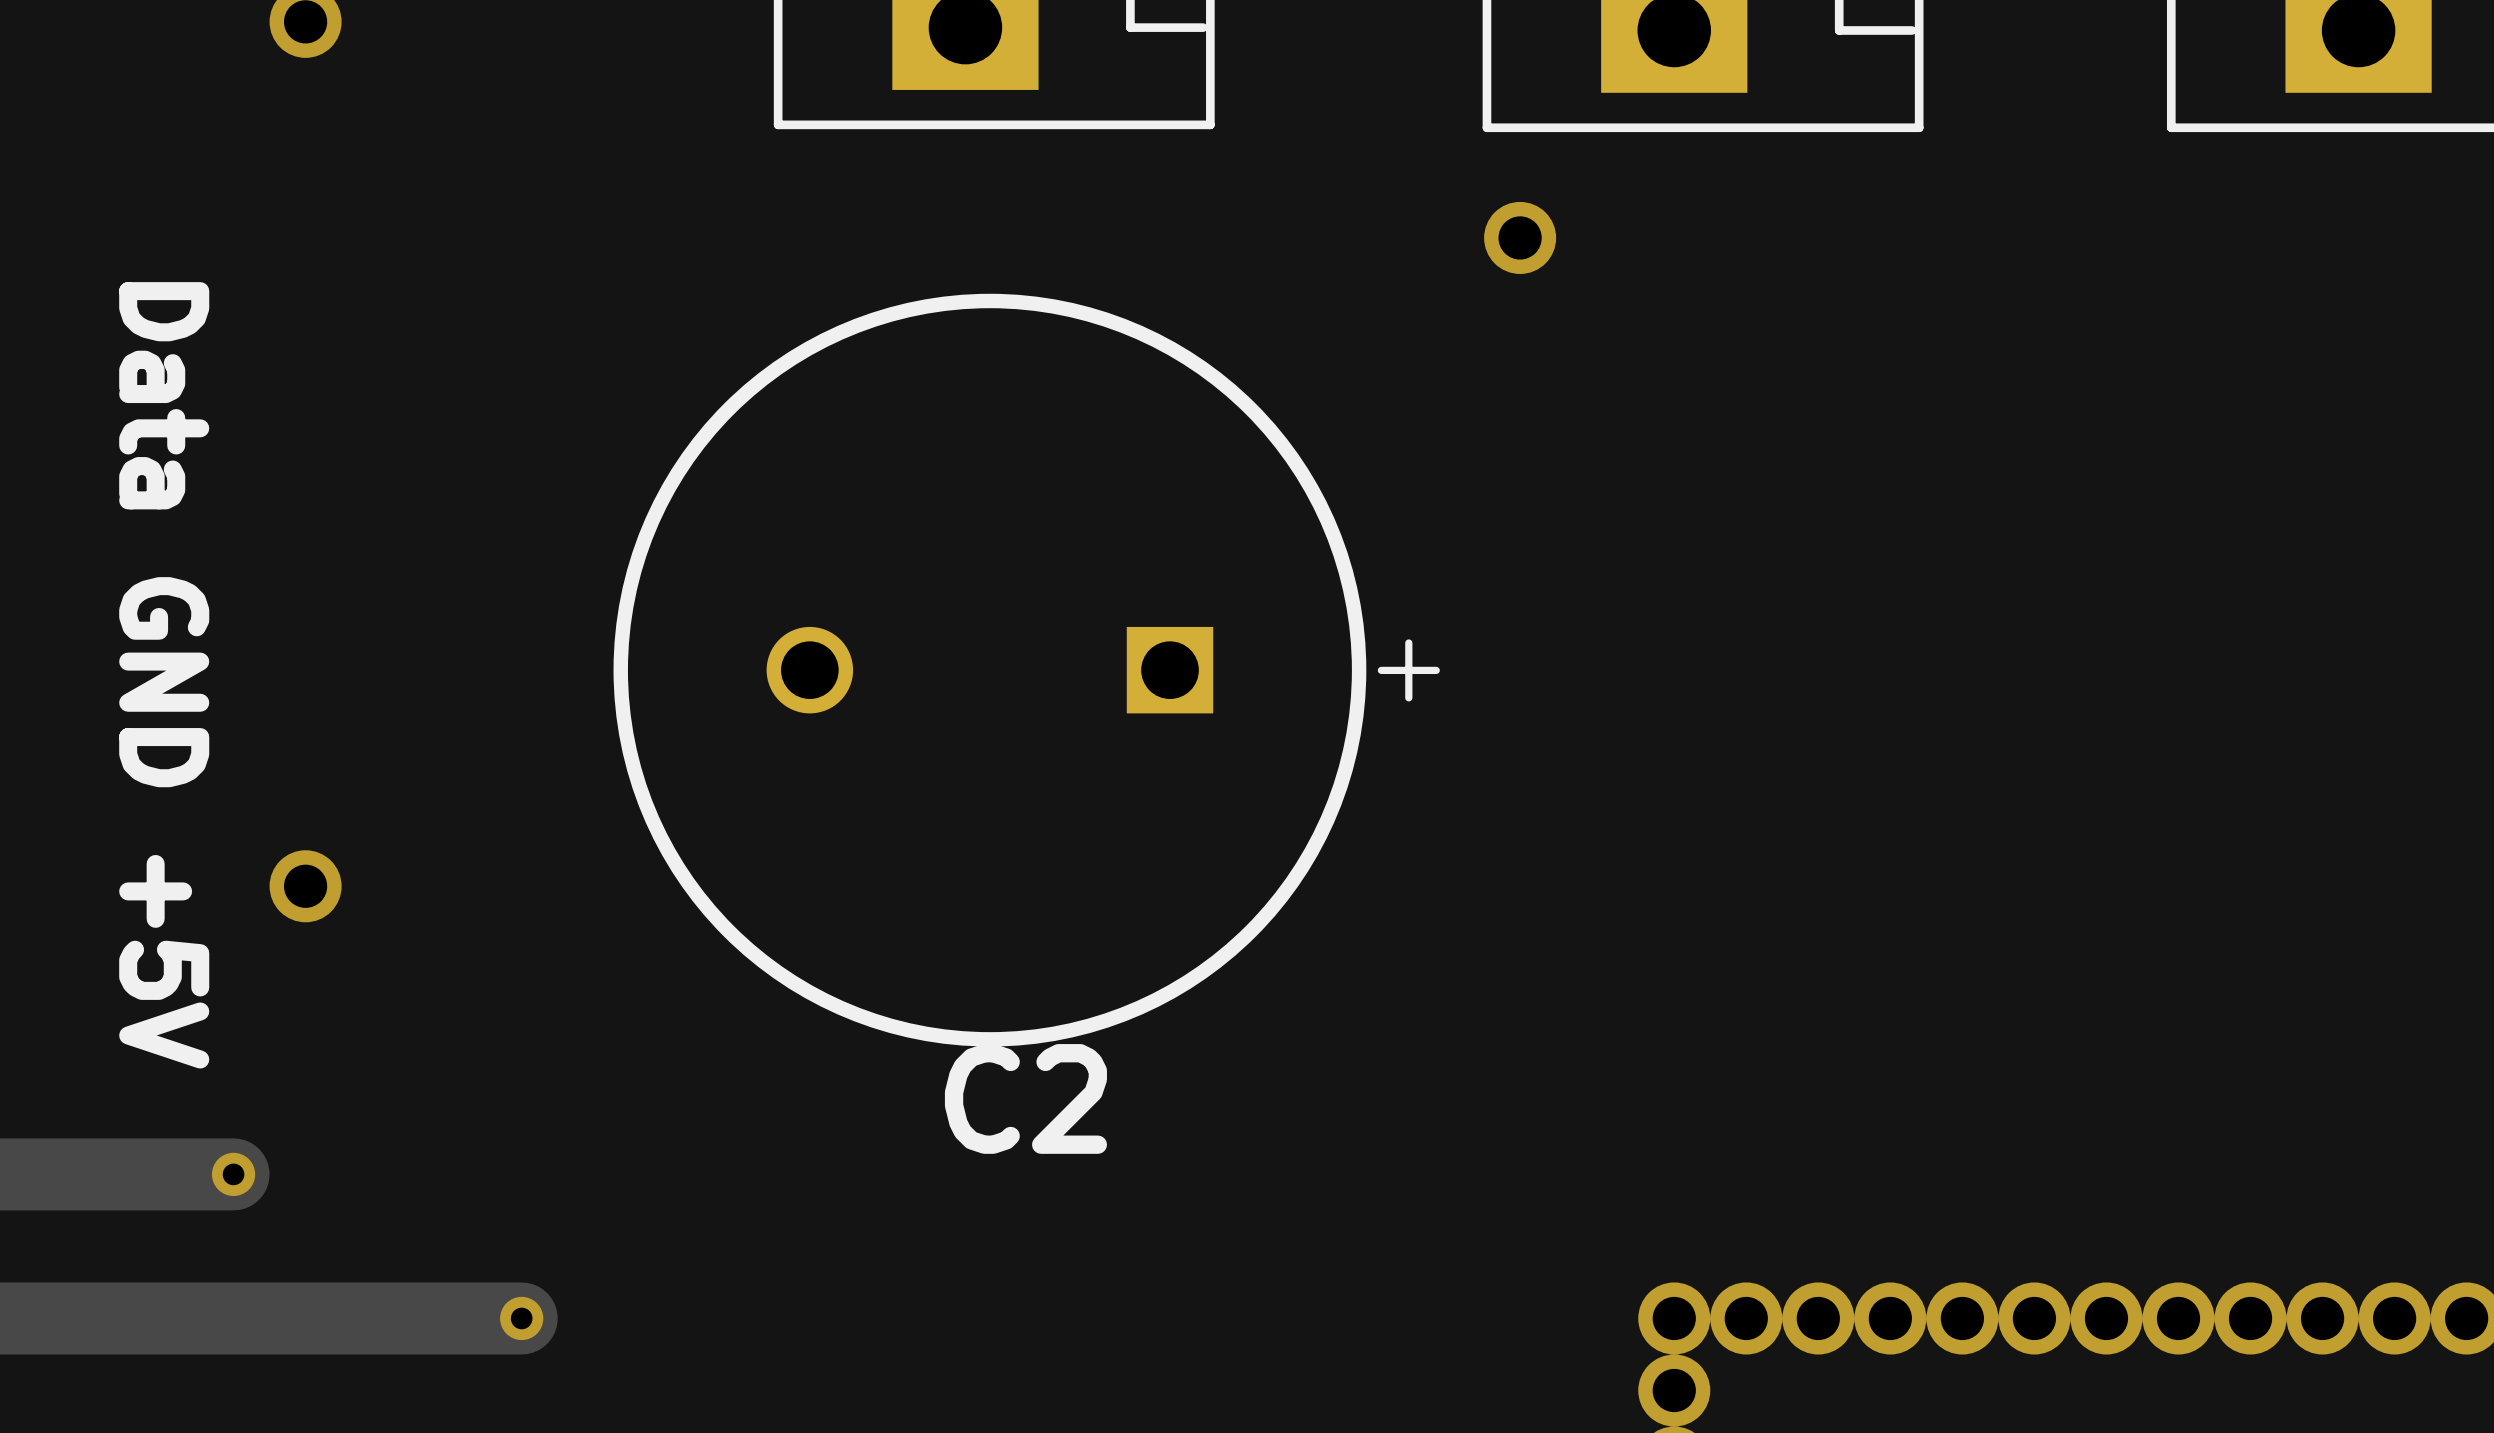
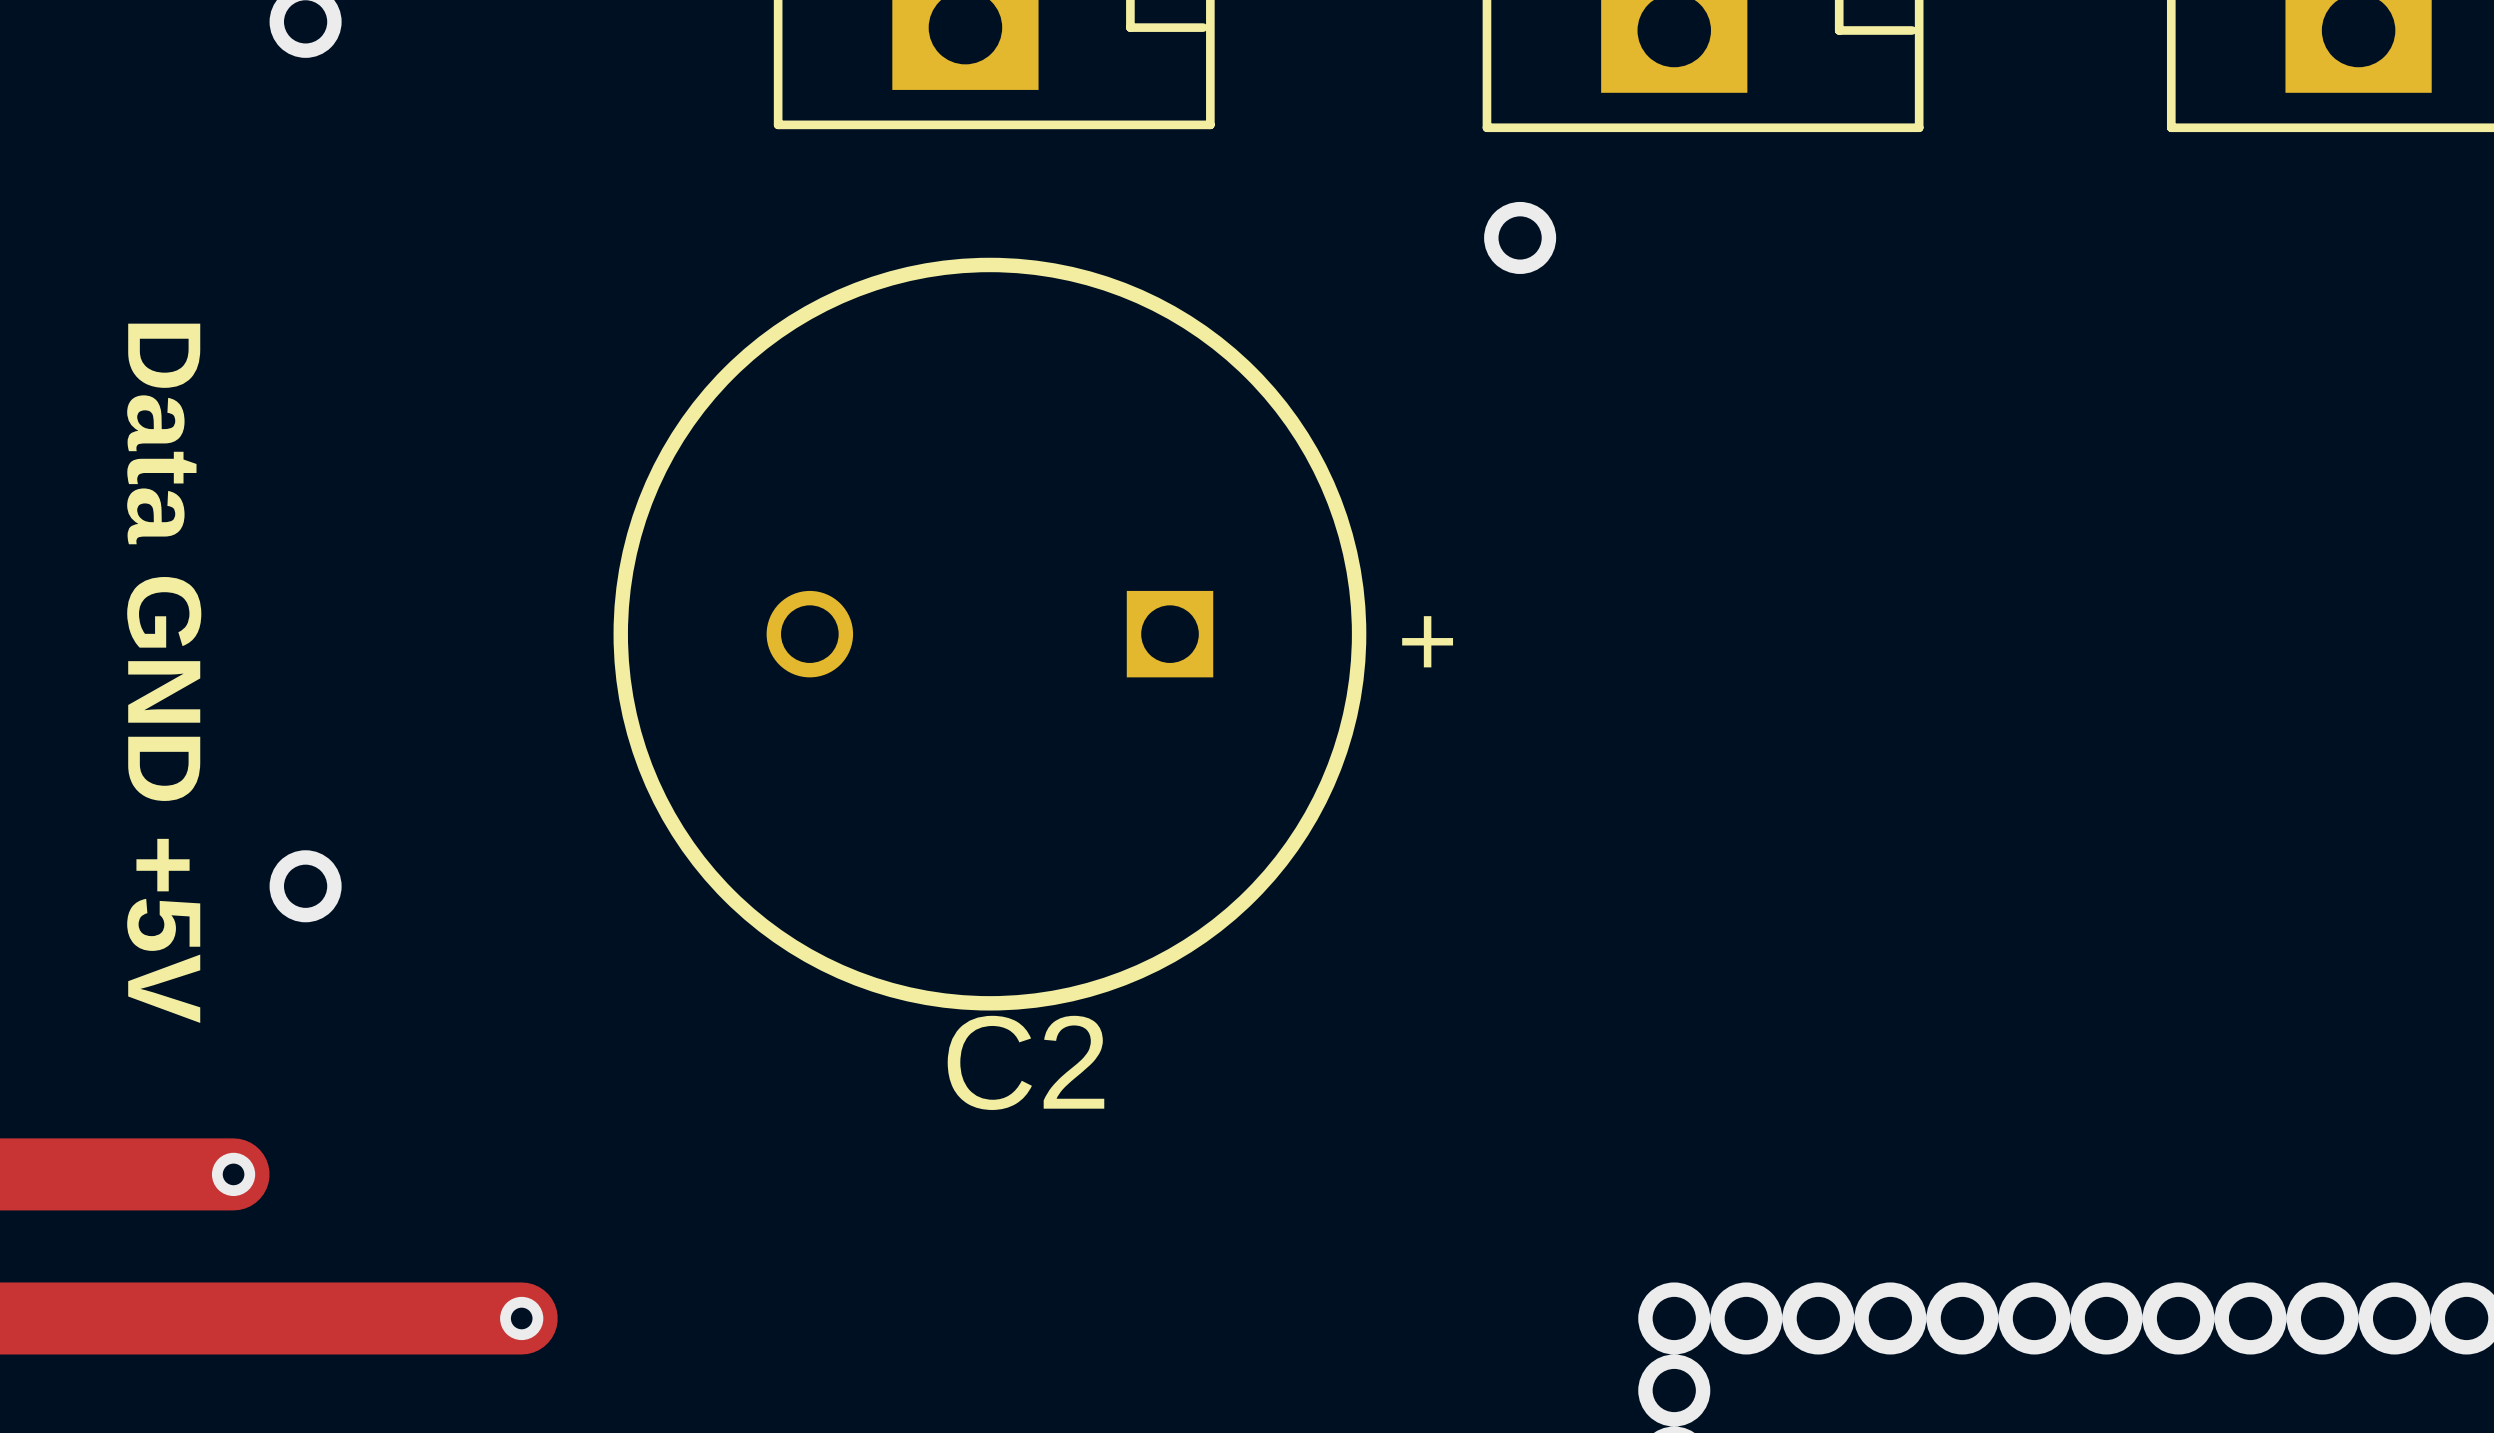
C2 position: (989, 670) -> (989, 634)

